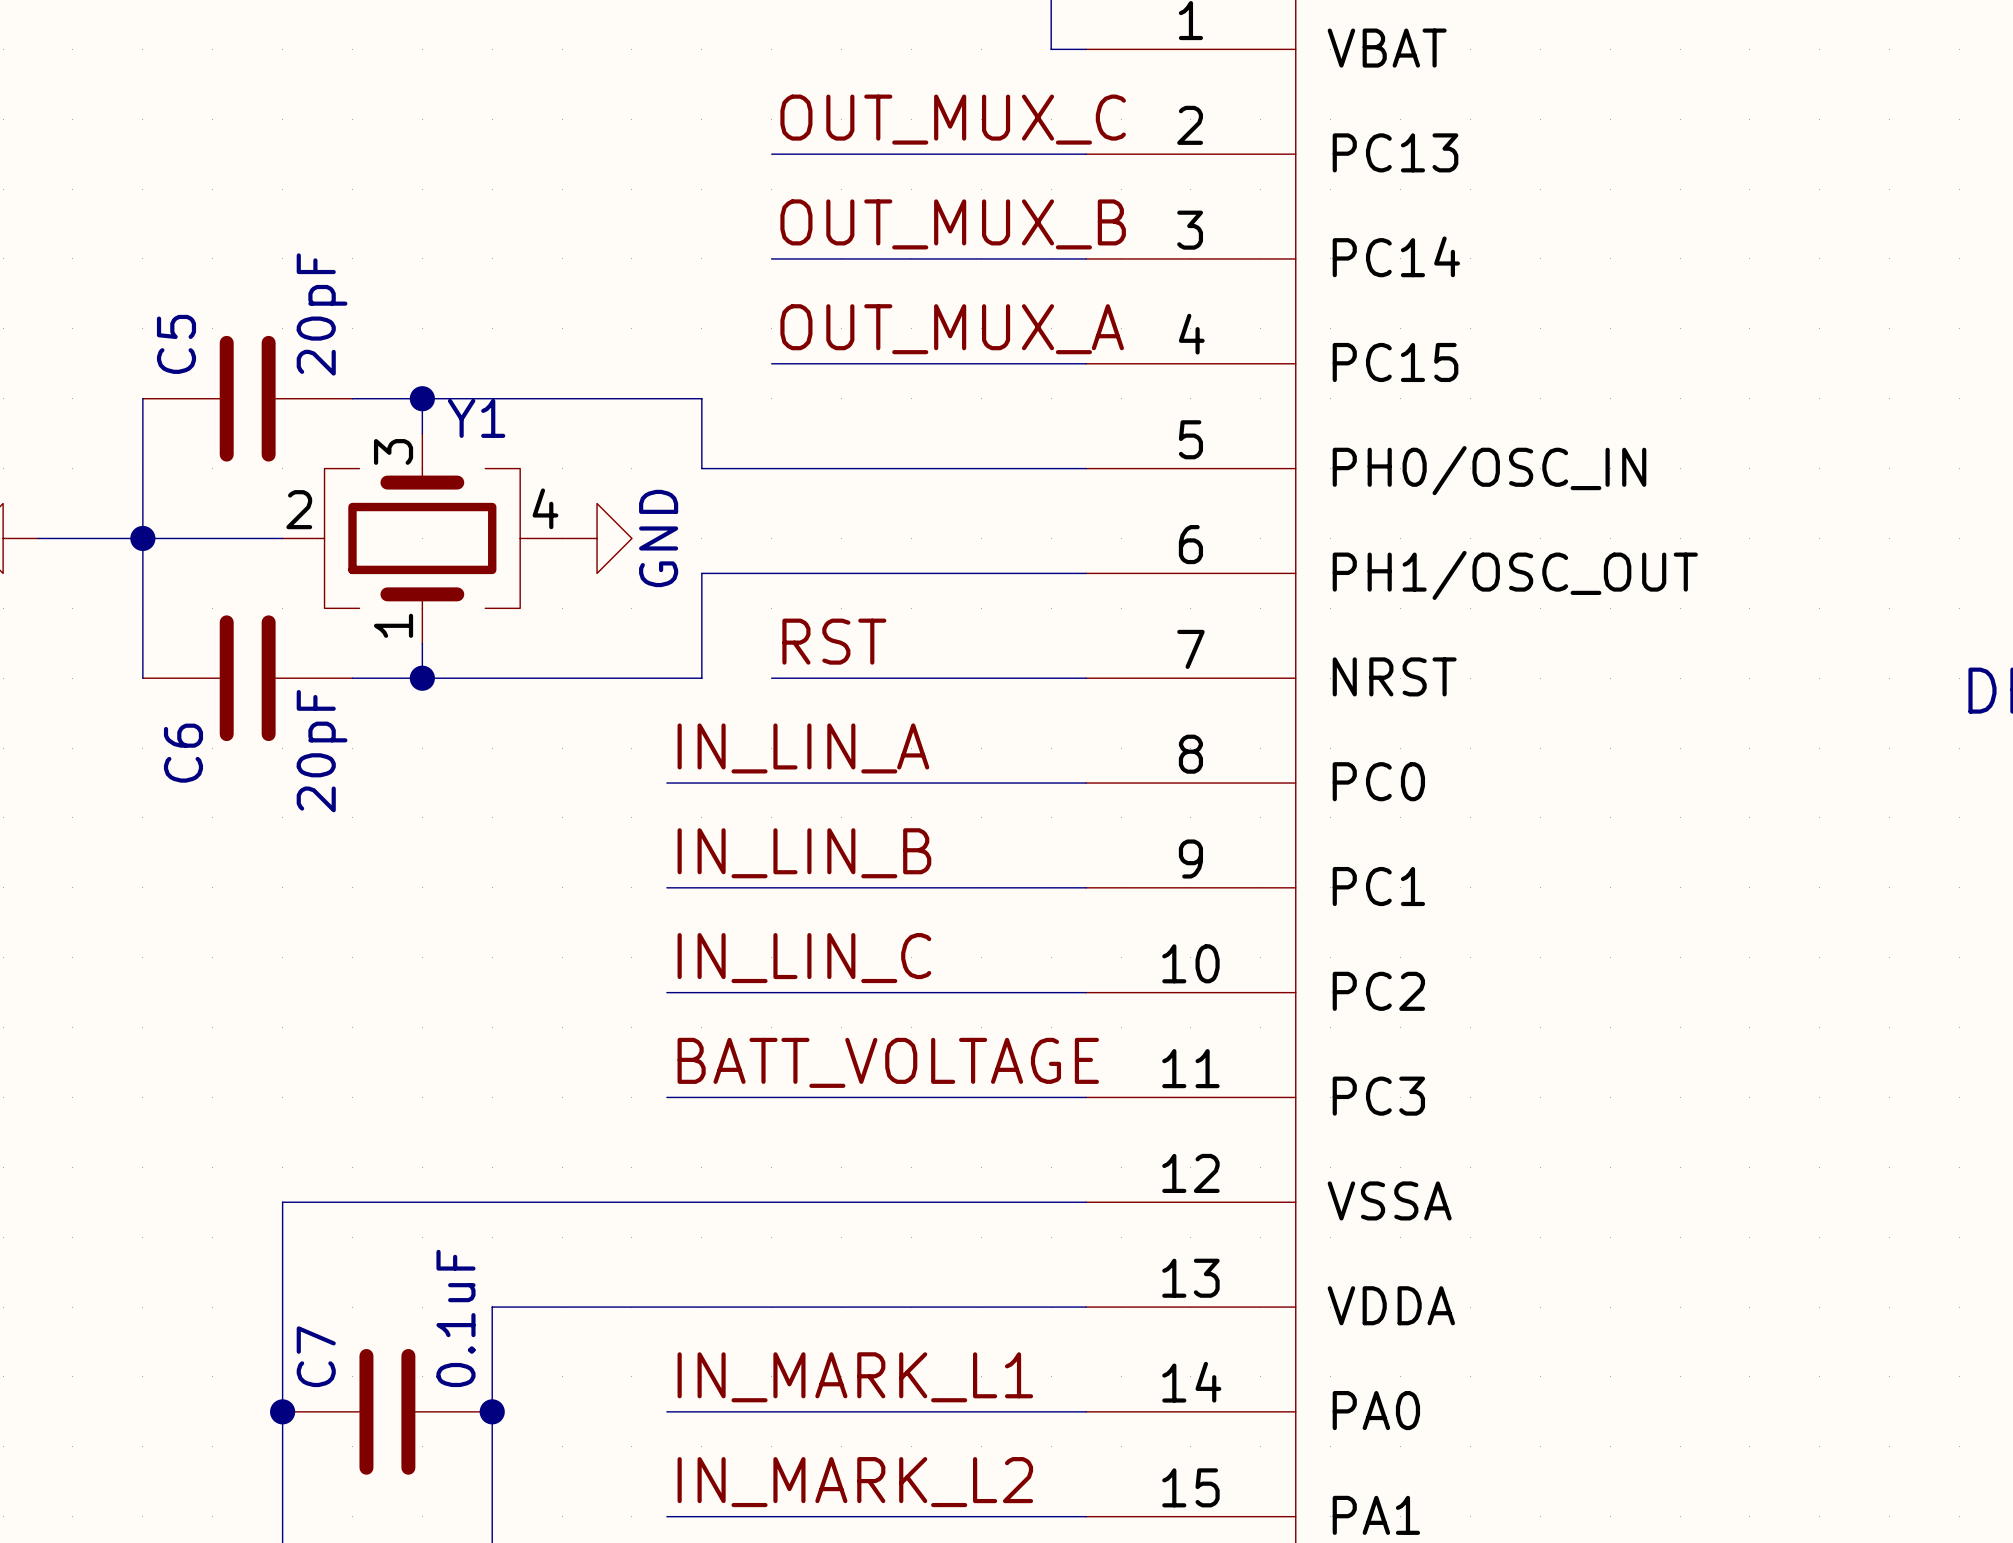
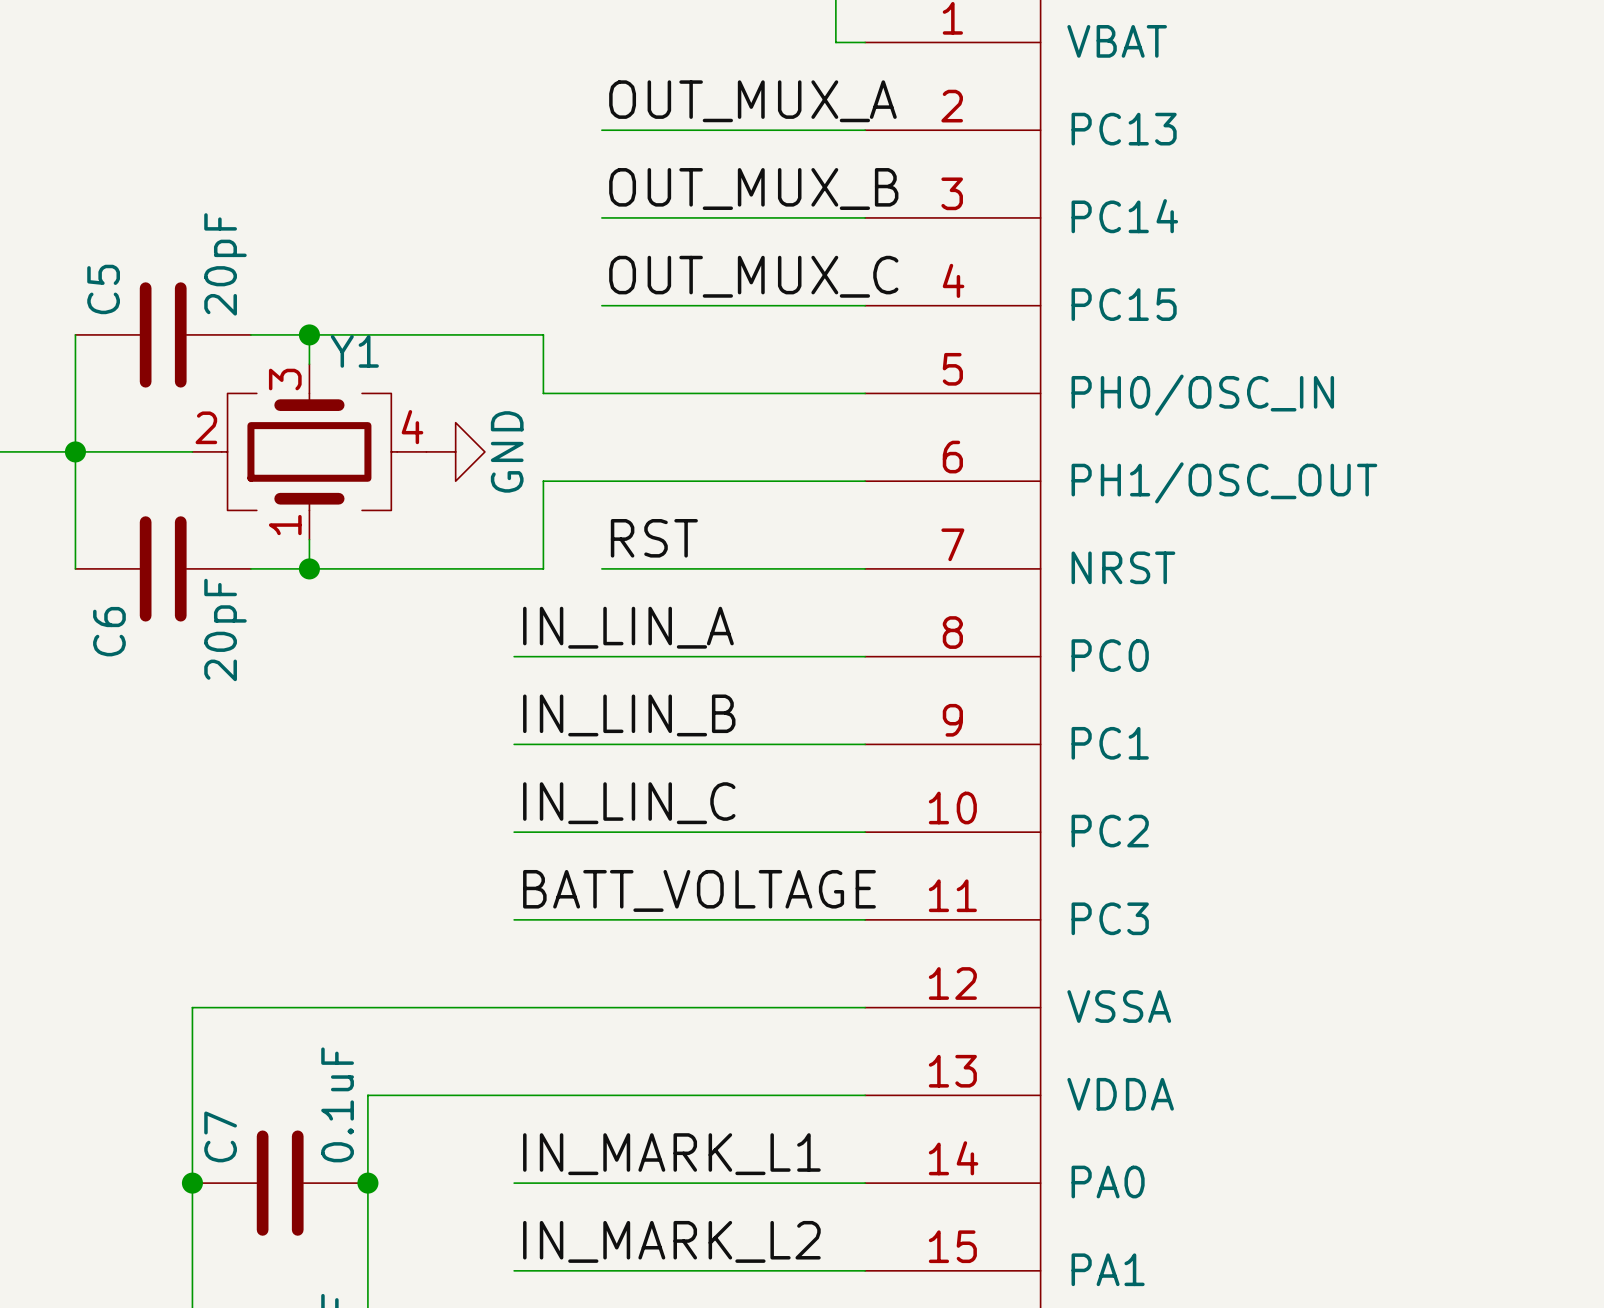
label: OUT_MUX_C (953, 119) -> OUT_MUX_A (752, 101)
label: OUT_MUX_A (952, 329) -> OUT_MUX_C (753, 276)

